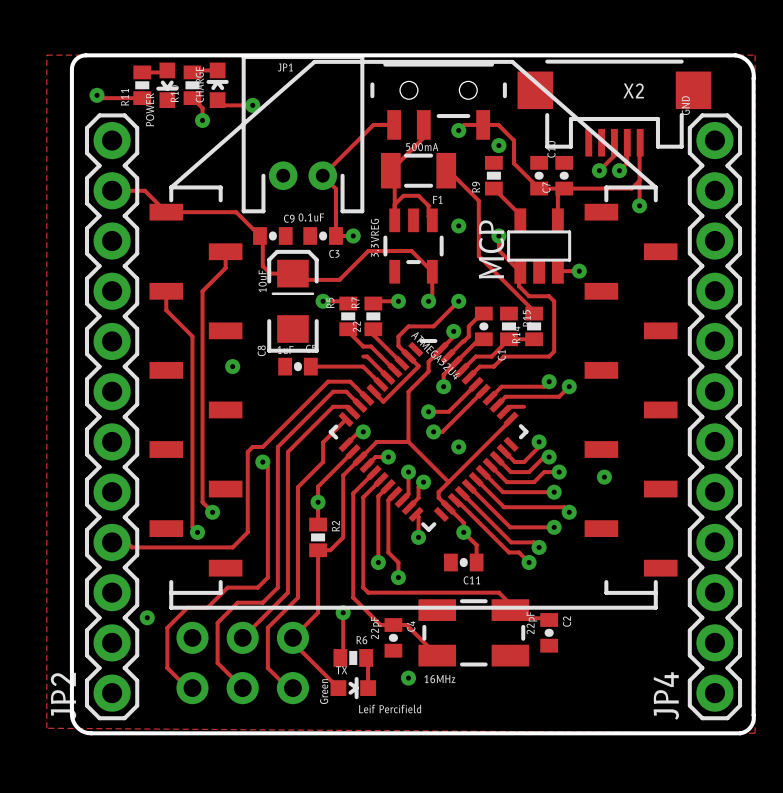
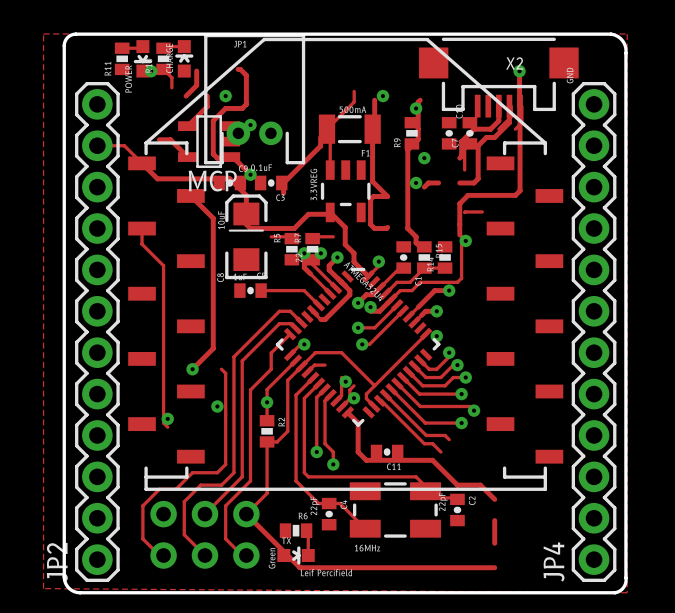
track: (97, 95) (99, 98) (142, 98) -> none
via: (97, 95) -> none
track: none -> (238, 69) (246, 75) (246, 104) (242, 108) (225, 108) (213, 120) (213, 154) (217, 158) (232, 157) (250, 174)
track: (217, 100) (222, 105) (252, 105) -> none
track: none -> (196, 71) (196, 85) (186, 96)
via: none -> (519, 71)
part: (438, 101) -> none
via position: (252, 105) -> (225, 96)
X2 position: (614, 108) -> (498, 77)
via position: (202, 120) -> (151, 71)
track: (394, 124) (373, 124) (322, 175) (335, 188) (335, 235) (353, 235) -> none
track: none -> (207, 96) (207, 106) (187, 126)
track: (458, 130) (464, 124) (498, 124) (513, 140) (513, 163) (539, 188) (631, 188) (639, 180) -> none
track: none -> (374, 100) (372, 181) (387, 196) (373, 196) (370, 199) (370, 224) (374, 228) (387, 227)
track: none -> (420, 100) (418, 102) (418, 139) (407, 149) (407, 228) (416, 236) (416, 242) (420, 246)
track: none -> (498, 106) (498, 120) (490, 129) (474, 129) (461, 141) (461, 156) (459, 158)
track: none -> (509, 106) (509, 122) (494, 137) (486, 137) (478, 145) (478, 178) (474, 182) (459, 182)
track: (640, 142) (639, 205) -> none
via: none -> (250, 125)
track: (446, 170) (448, 170) (478, 200) (478, 256) (534, 311) (534, 313) -> none
via: (599, 170) -> none
via: (619, 170) -> none
track: none -> (320, 137) (320, 146) (283, 182) (283, 193)
track: none -> (159, 139) (170, 139) (187, 157)
track: (493, 188) (520, 214) (520, 220) -> none
track: (394, 204) (403, 195) (418, 195) (428, 205) (428, 216) (432, 220) -> none
via: none -> (424, 158)
via: (639, 205) -> none
track: (166, 212) (236, 212) (262, 238) (262, 266) (270, 273) (292, 273) (299, 279) (339, 279) (368, 251) (411, 251) (432, 271) (432, 297) (428, 301) -> (142, 163) (157, 178) (229, 178) (246, 195) (246, 224) (250, 228) (294, 228) (308, 214) (332, 214) (345, 227) (345, 244) (353, 253) (353, 262) (368, 276)
via: none -> (250, 174)
via: (458, 225) -> none
via: (353, 235) -> none
track: (498, 235) (498, 250) (520, 271) (519, 286) (529, 296) (549, 296) (551, 299) -> (519, 71) (520, 190) (515, 195) (468, 195) (459, 203) (459, 234)
track: none -> (438, 182) (428, 182) (424, 187)
MCP rotation: 0° (539, 246) -> 90° counterclockwise (209, 141)
MCP position: (539, 246) -> (209, 141)
track: (225, 251) (225, 268) (202, 291) (202, 502) (212, 512) -> (190, 195) (213, 218) (213, 348) (192, 369)
via: (579, 271) -> none
via: (323, 301) -> none
via: (398, 301) -> none
via: (428, 301) -> none
track: (458, 301) (433, 326) (408, 326) (398, 336) (398, 345) (418, 366) (383, 401) -> (337, 257) (329, 265) (329, 269) (349, 290) (349, 294) (325, 319) (320, 319)
via: (458, 301) -> none
via: none -> (465, 240)
track: (483, 313) (468, 326) (468, 336) (448, 356) -> none
via: none -> (304, 253)
via: none -> (320, 253)
via: none -> (337, 257)
track: (348, 329) (363, 346) (370, 346) -> (304, 253) (304, 267) (310, 274)
track: (441, 349) (428, 361) (428, 371) (408, 391) (408, 441) -> none
track: (363, 356) (367, 356) (387, 377) -> none
via: (232, 366) -> none
track: (446, 371) (443, 374) (443, 386) -> (373, 294) (366, 294) (358, 303)
track: none -> (391, 299) (379, 311) (370, 311)
via: none -> (358, 303)
track: (549, 381) (544, 386) (501, 386) -> (449, 290) (434, 290) (418, 307)
via position: (549, 381) -> (449, 290)
track: (569, 386) (559, 396) (505, 396) -> (436, 311) (425, 311) (421, 315)
via: (569, 386) -> none
via: none -> (436, 311)
track: (367, 398) (350, 381) (328, 381) (262, 446) (252, 446) (247, 452) (247, 532) (232, 547) (132, 547) (127, 542) (112, 542) -> none
track: (524, 406) (509, 406) (504, 412) -> none
via: none -> (436, 336)
via: (458, 446) -> none
via: (388, 457) -> none
via: none -> (192, 369)
via: (262, 462) -> none
via: (408, 472) -> none
via: none -> (345, 381)
via: (604, 477) -> none
via: (423, 482) -> none
via: none -> (353, 398)
via: none -> (217, 406)
track: (448, 507) (463, 522) (463, 532) (476, 545) (476, 562) -> none
via: (212, 512) -> none
track: (416, 514) (418, 516) (418, 537) -> (347, 412) (358, 423) (358, 452) (366, 460) (432, 460) (457, 485) (480, 485) (494, 499)
via: none -> (167, 418)
via: (197, 532) -> none
via: (463, 532) -> none
via: (418, 537) -> none
via: (539, 547) -> none
via: (529, 562) -> none
track: (343, 612) (343, 655) (340, 657) -> none
via: (343, 612) -> none
via: (147, 617) -> none
track: (292, 637) (292, 642) (338, 688) -> (246, 514) (299, 567) (494, 567)
track: none -> (494, 520) (494, 543)
via: (408, 678) -> none

